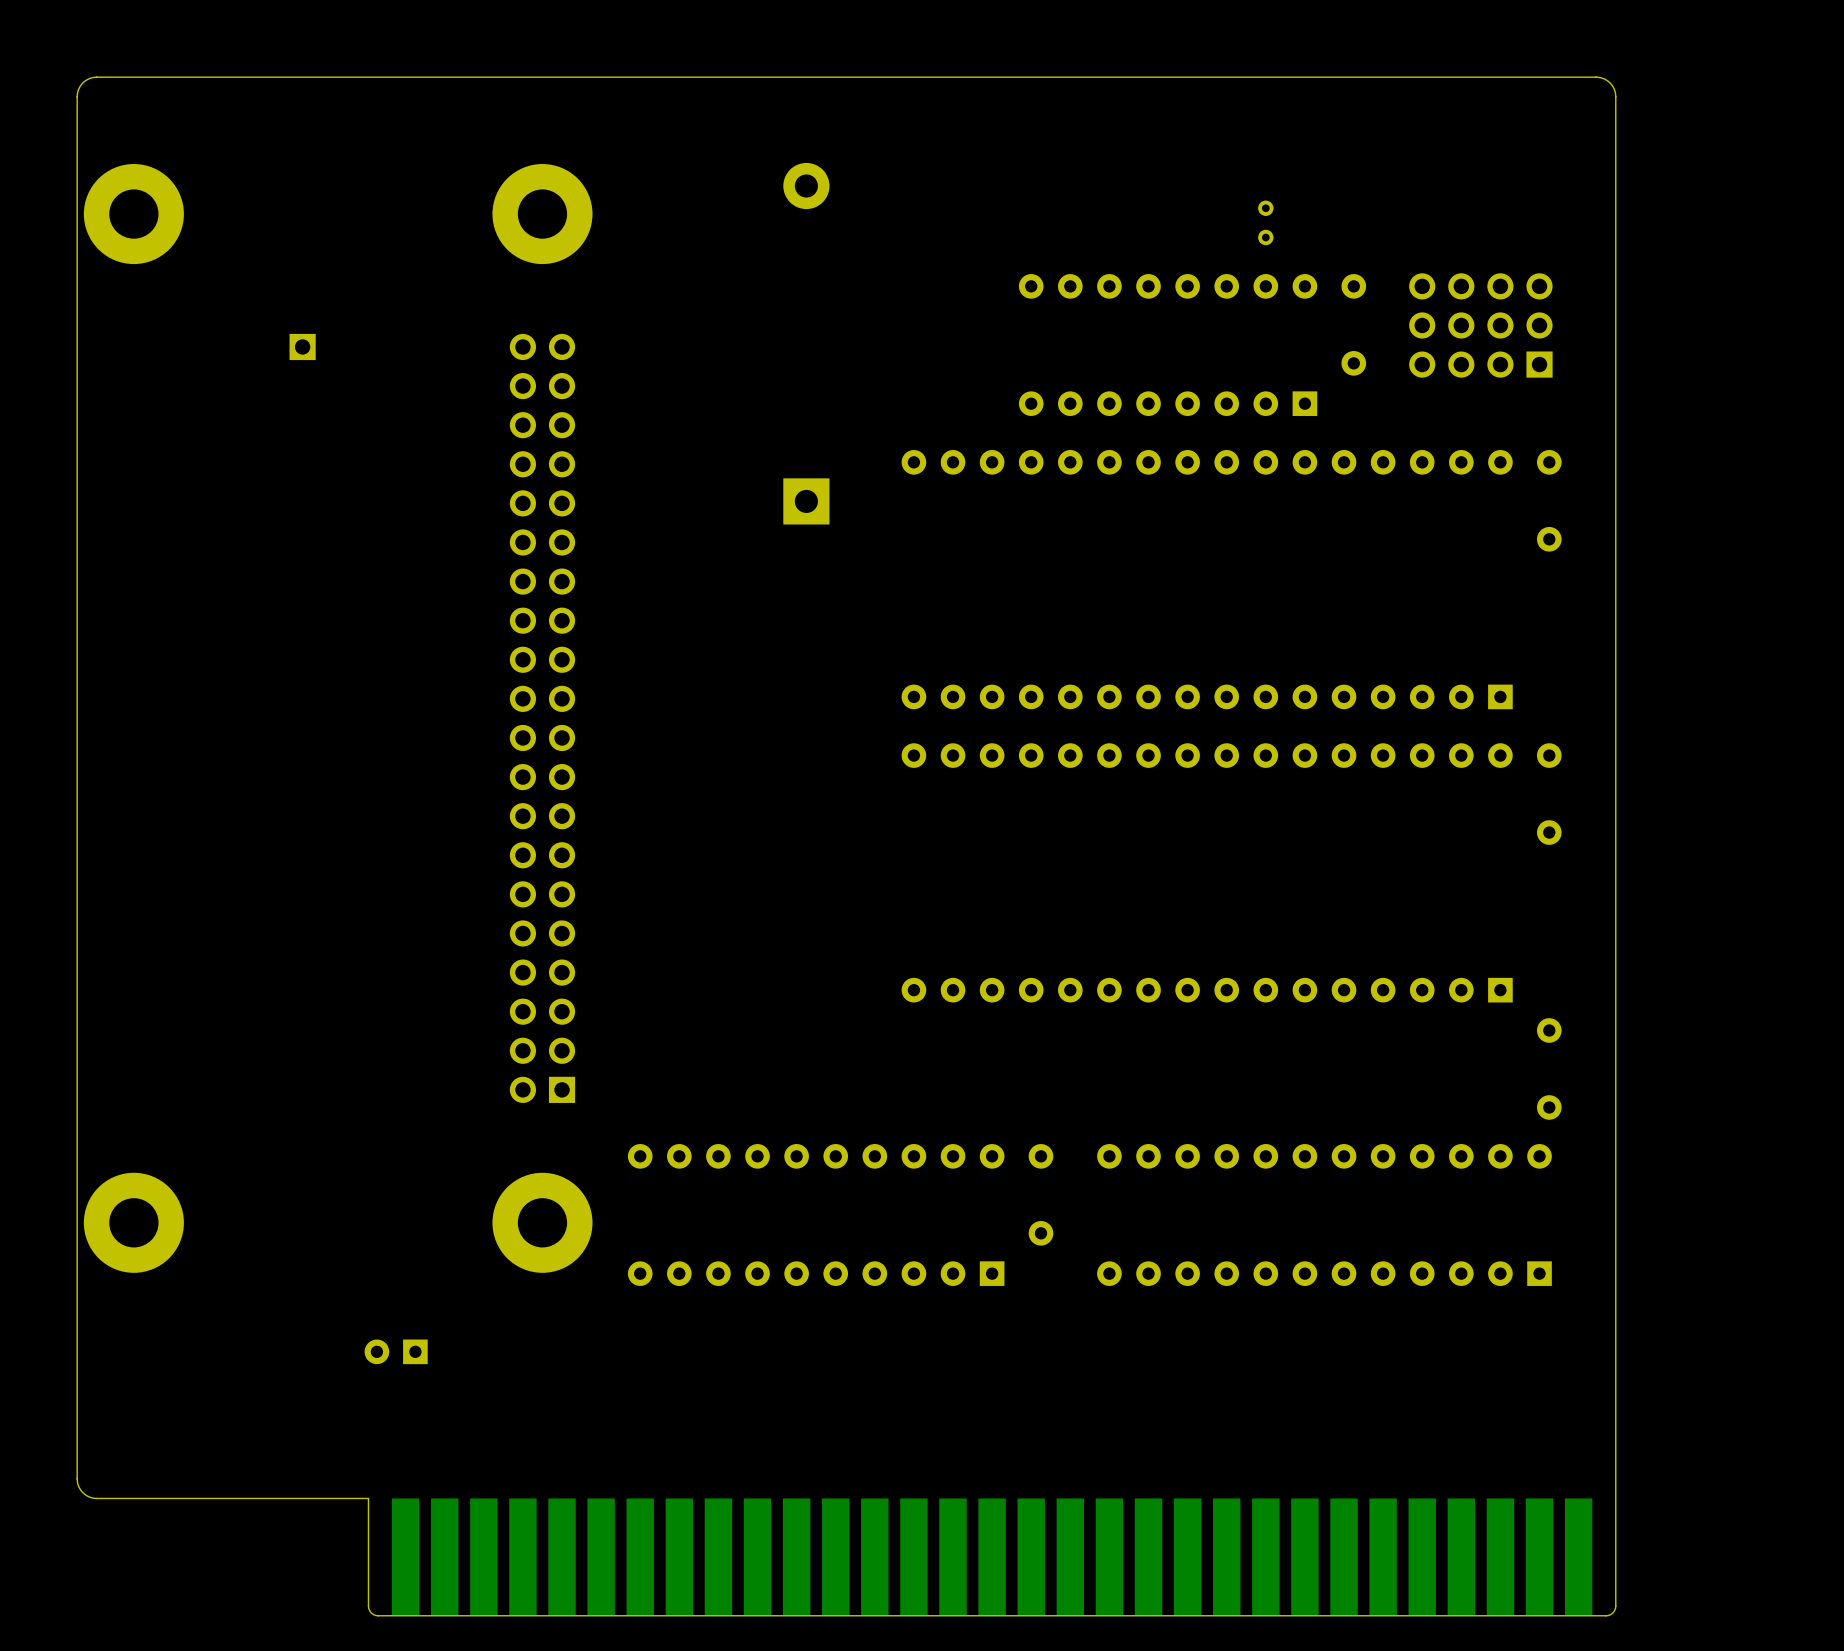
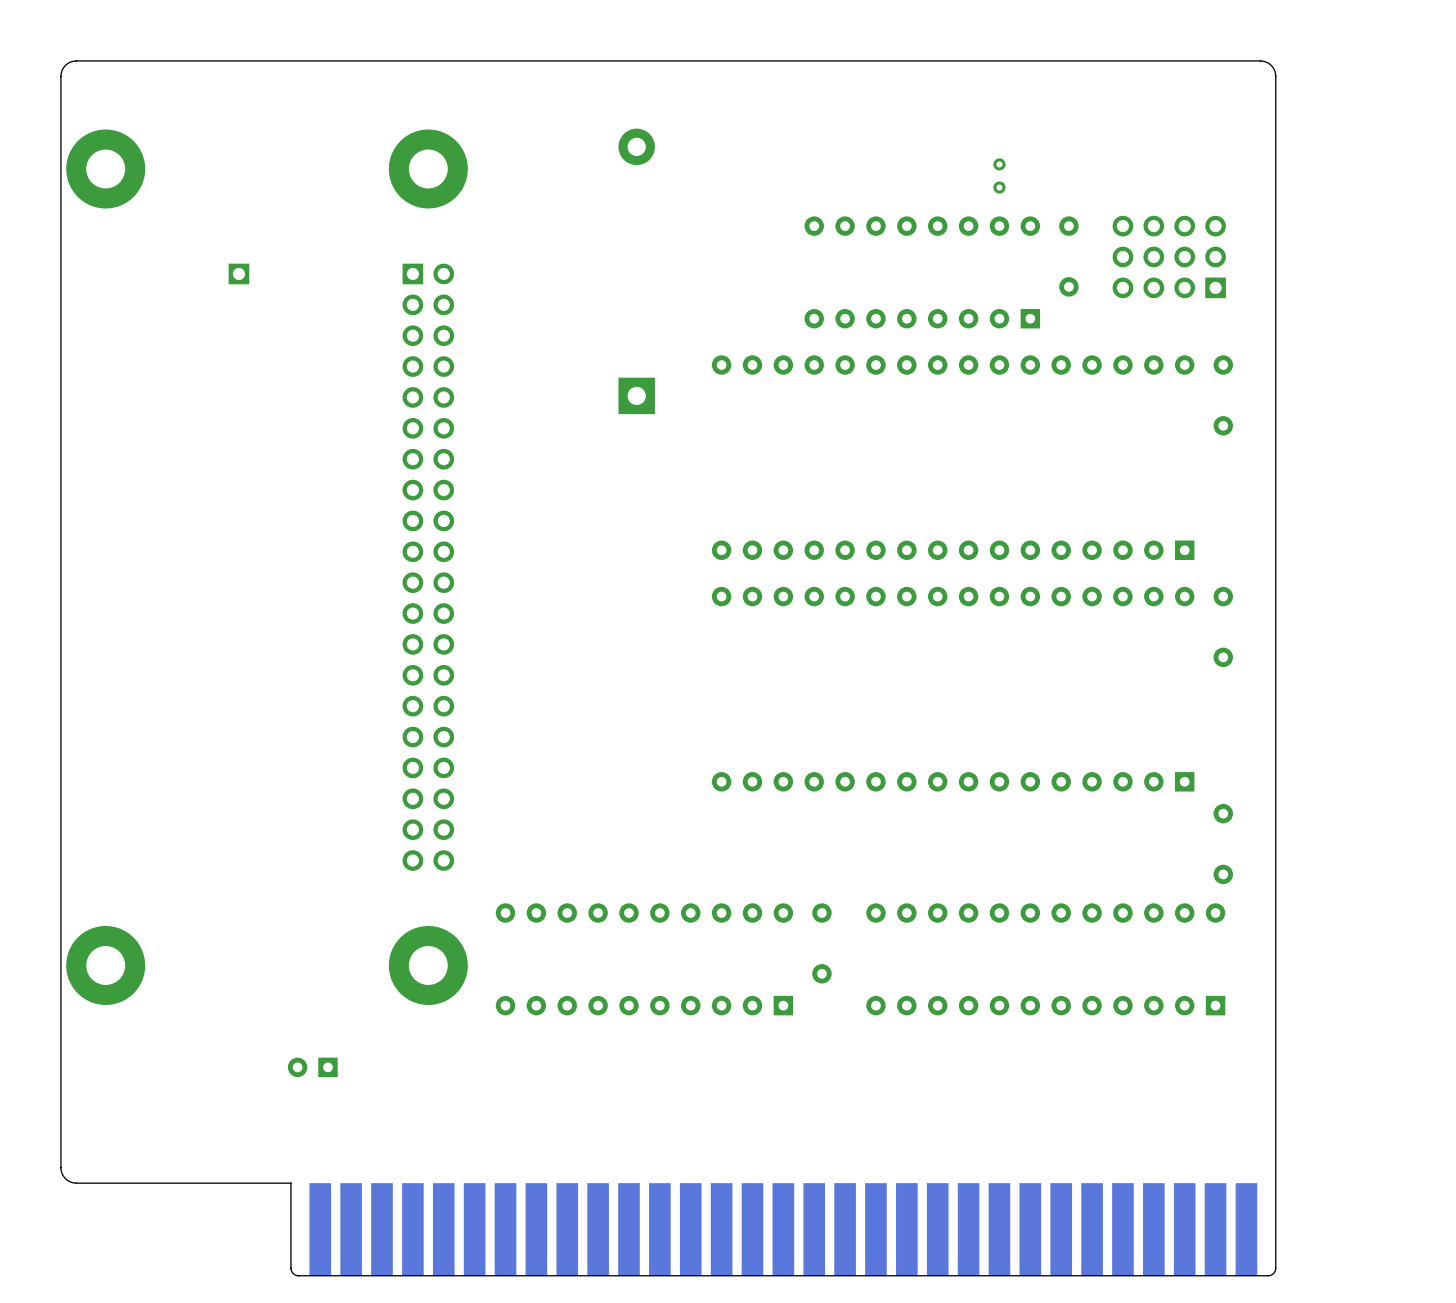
part rotation: 0° (542, 718) -> 180° (428, 567)

